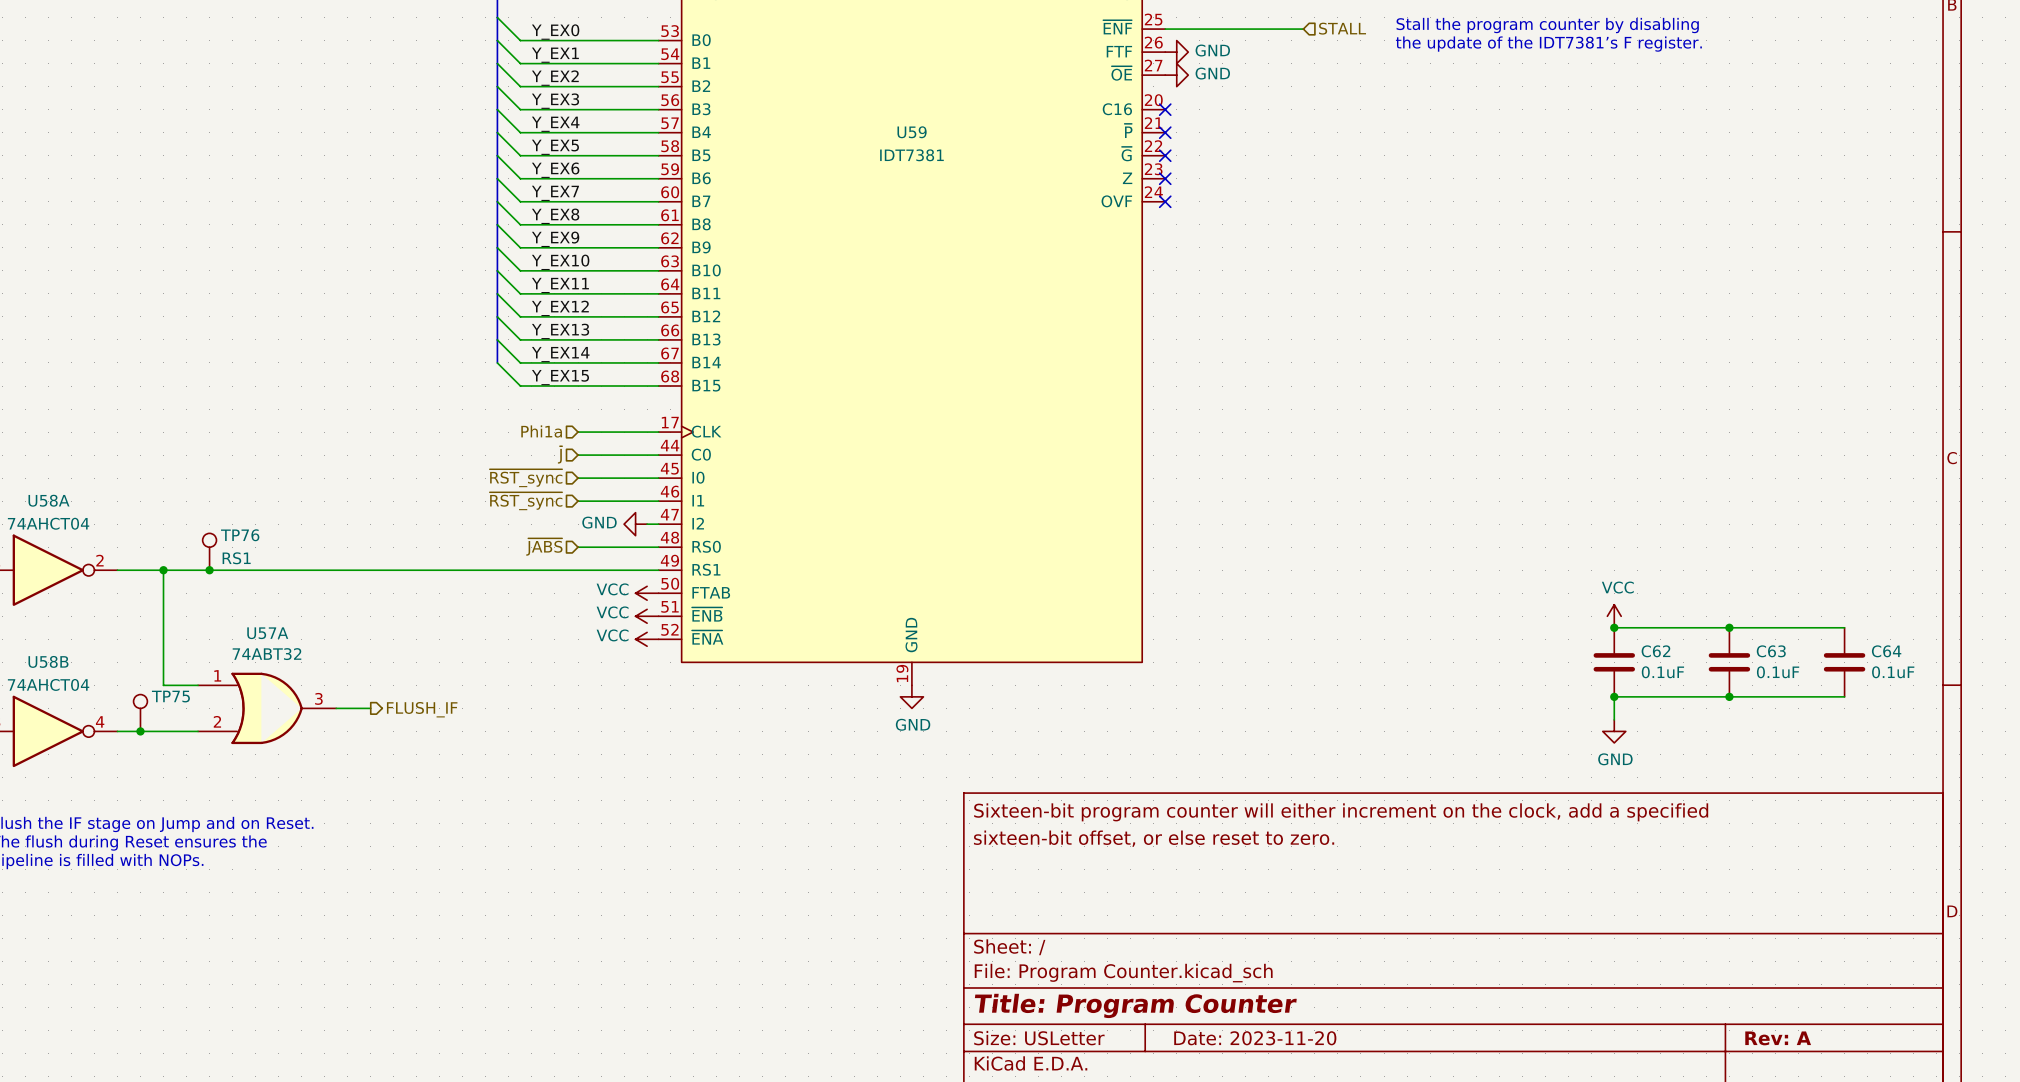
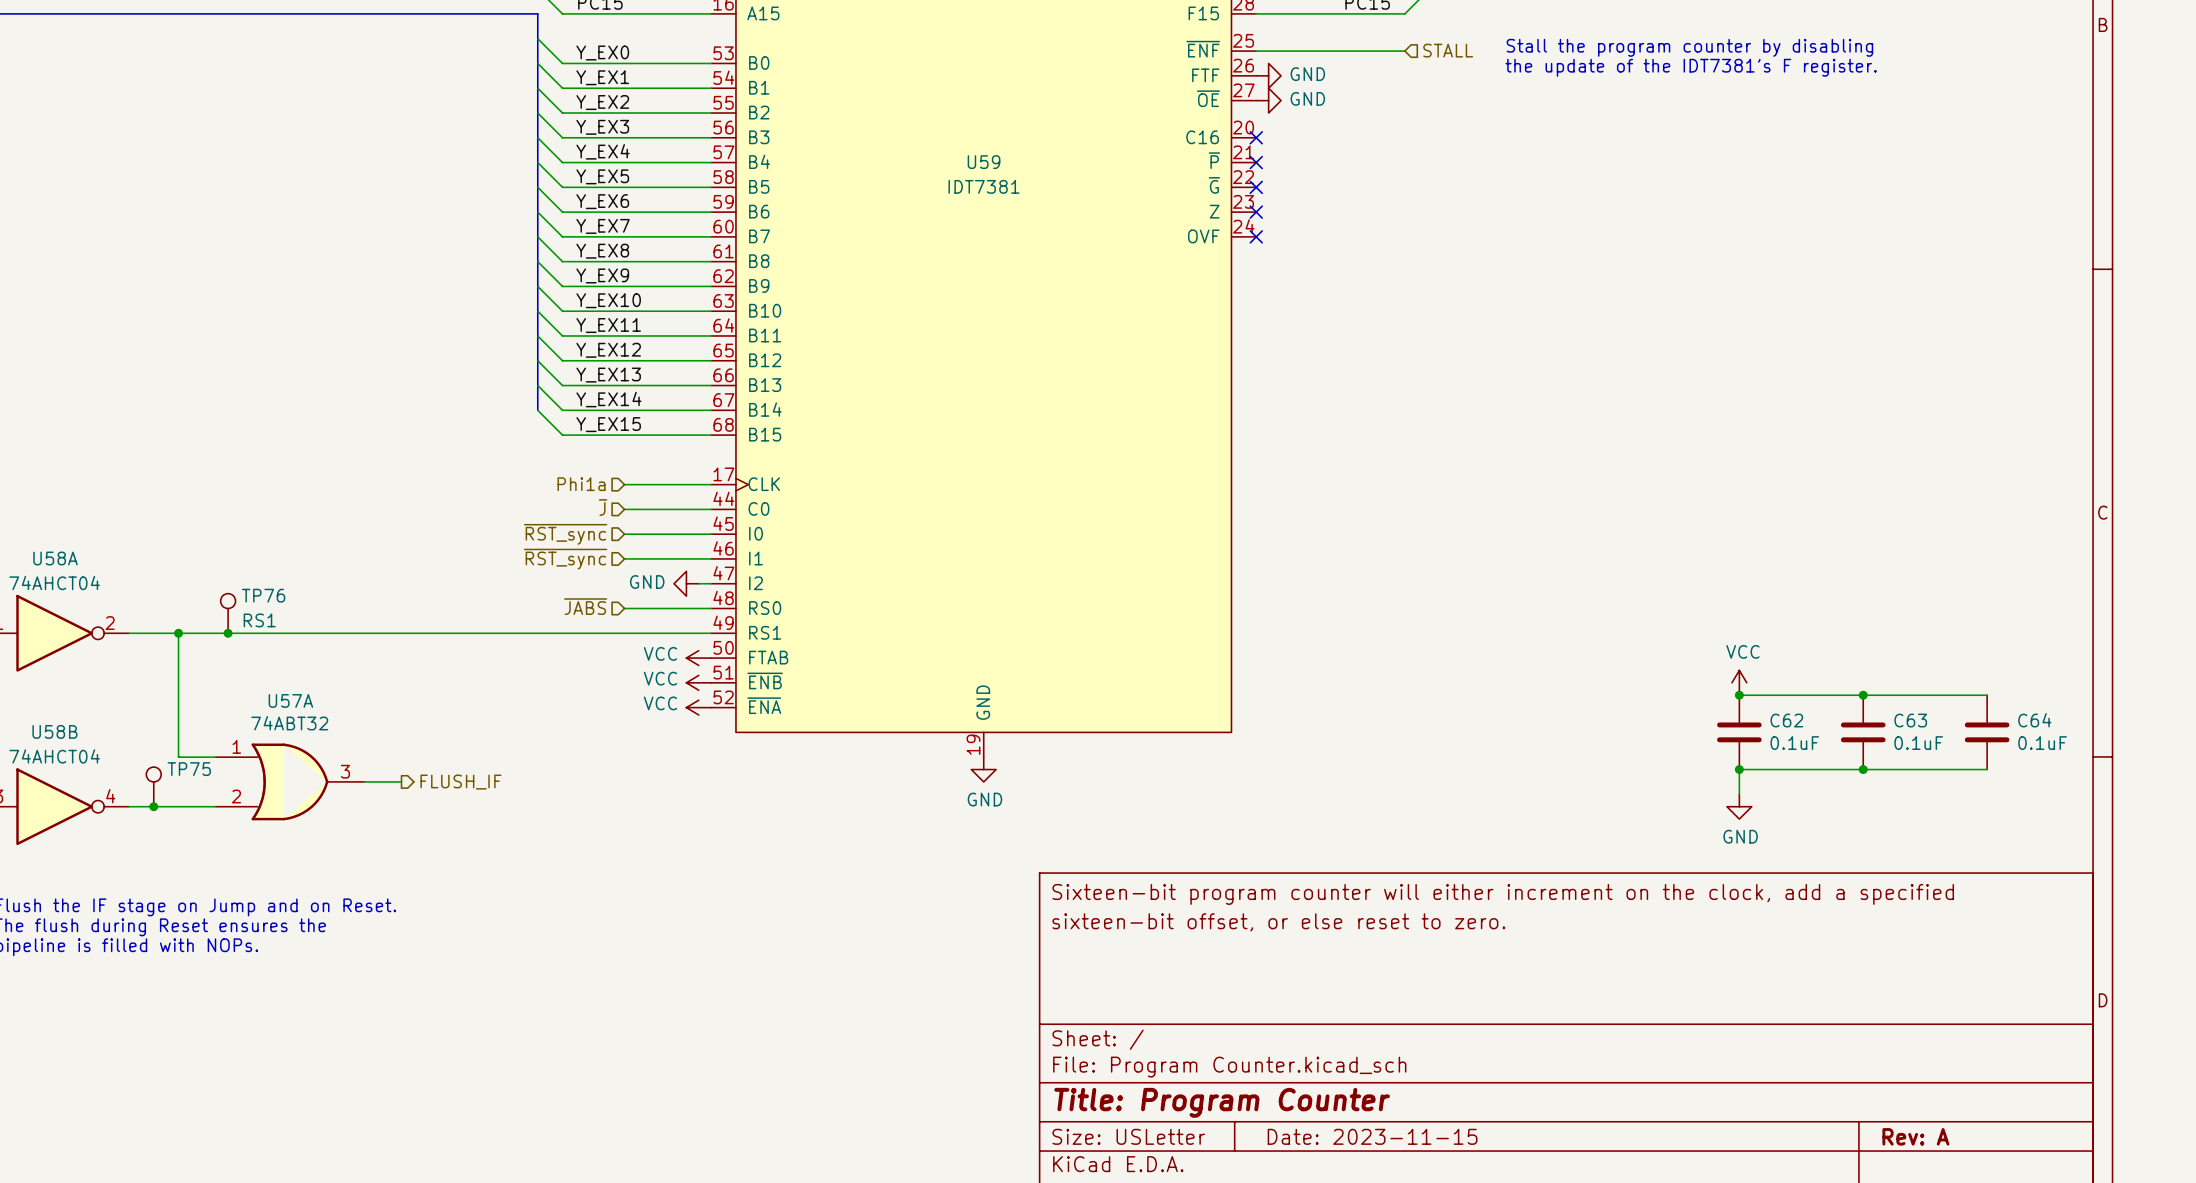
title block: Date: 2023-11-20 (1255, 1038) -> Date: 2023-11-15 (1372, 1136)

